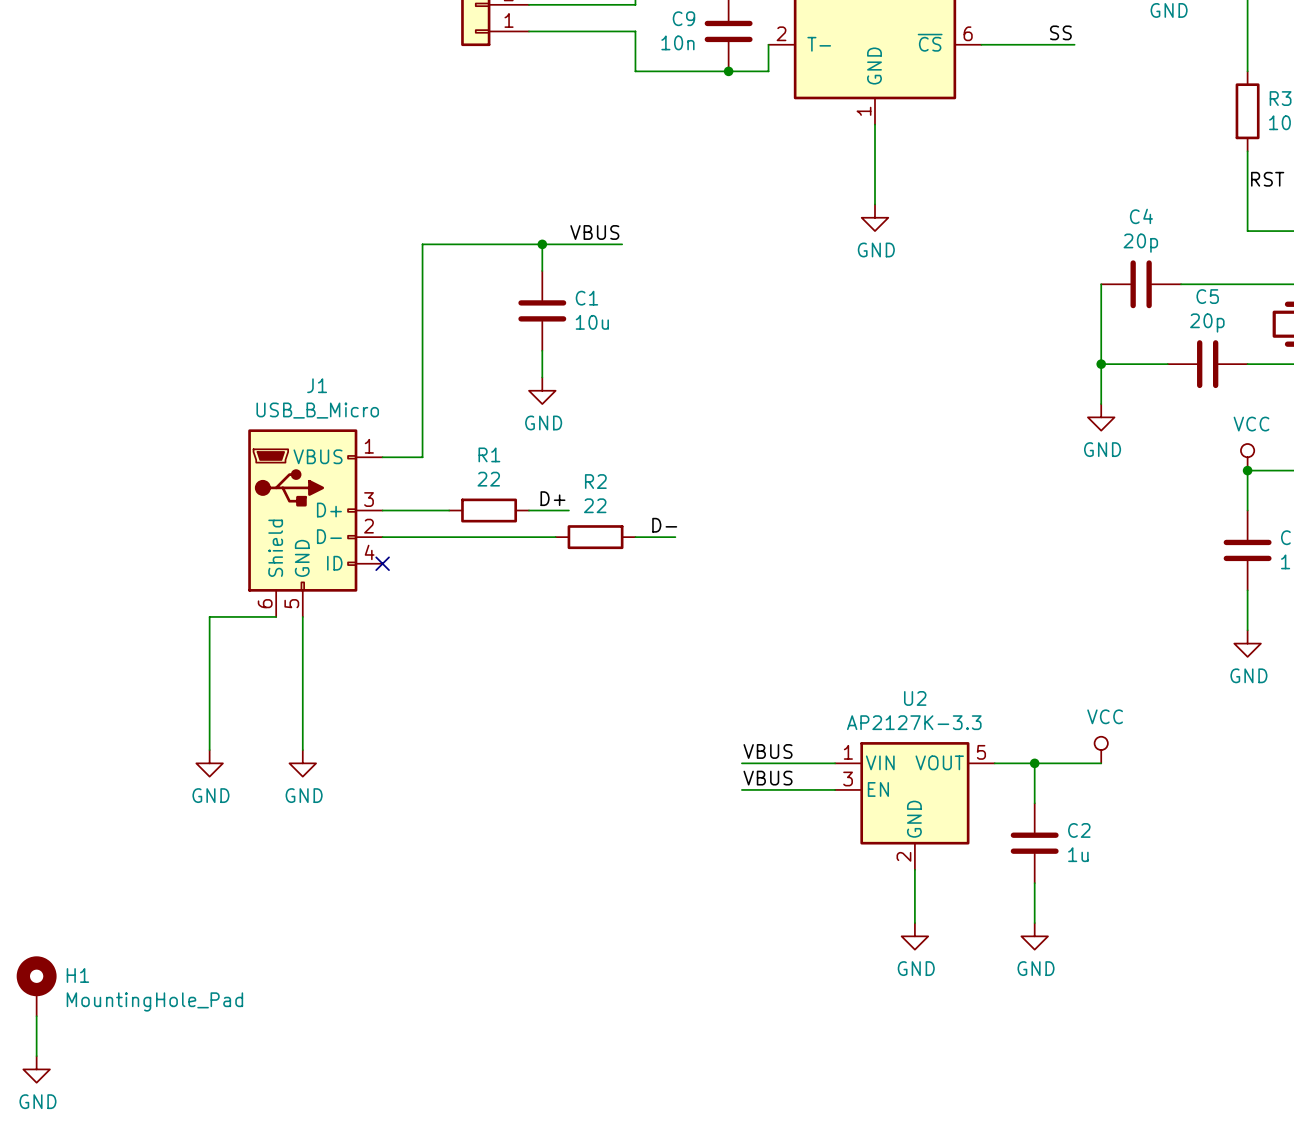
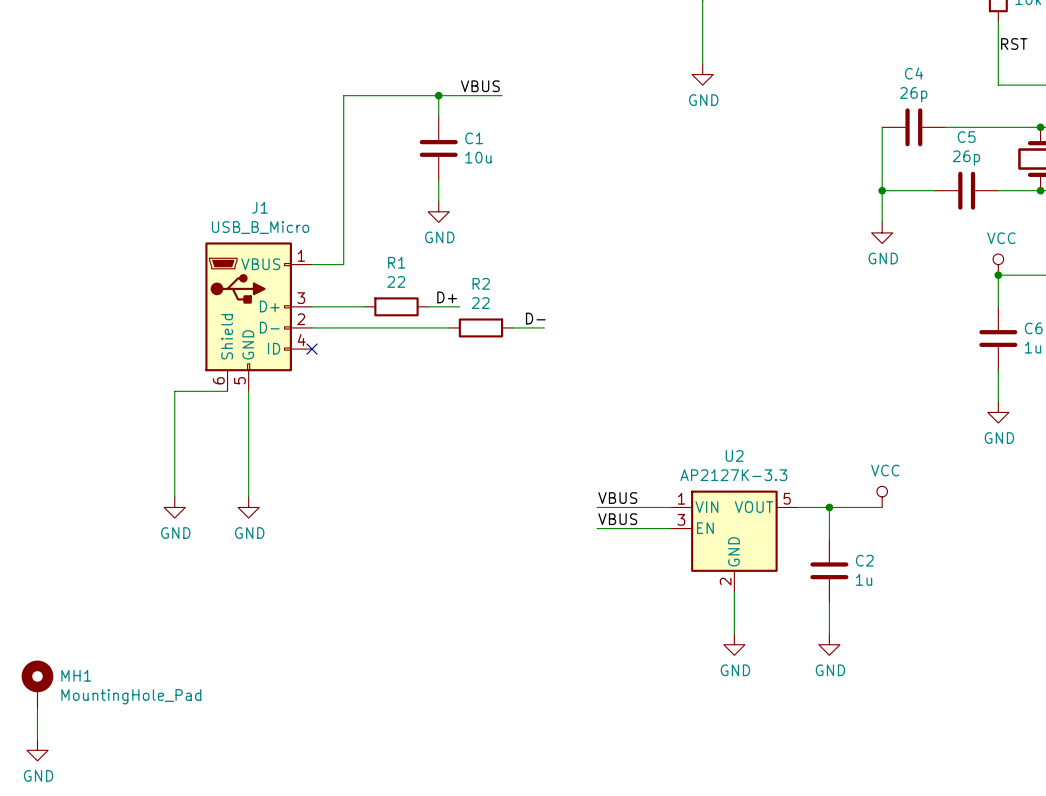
C4 value: 20p (1140, 243) -> 26p (913, 94)
C5 value: 20p (1207, 323) -> 26p (966, 158)
H1 name: H1 (77, 975) -> MH1 (76, 675)

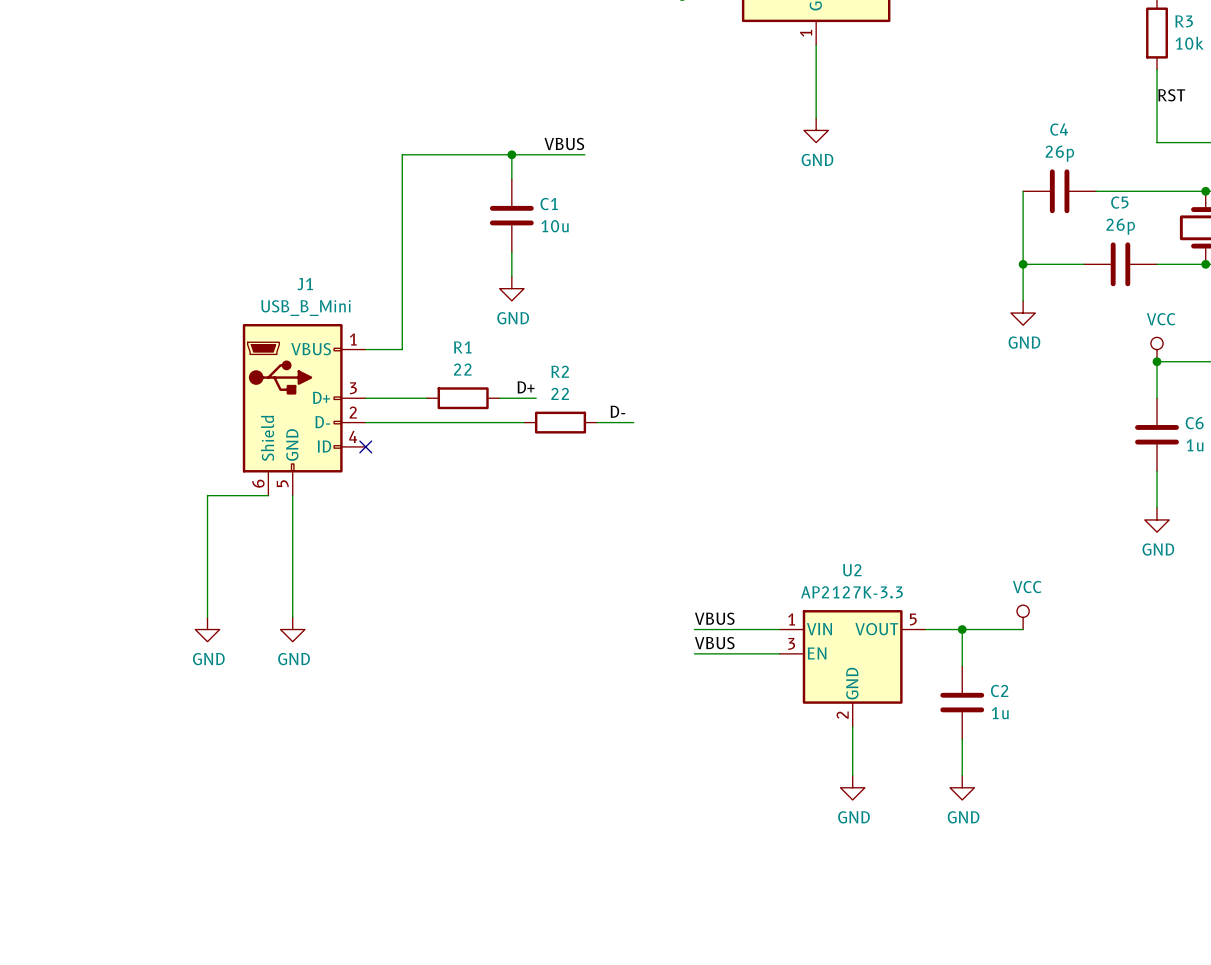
J1 value: USB_B_Micro (260, 227) -> USB_B_Mini (305, 308)
MH1: MountingHole_Pad (37, 684) -> none
wire: (37, 708) (37, 739) -> none
power symbol: GND (37, 750) -> none

